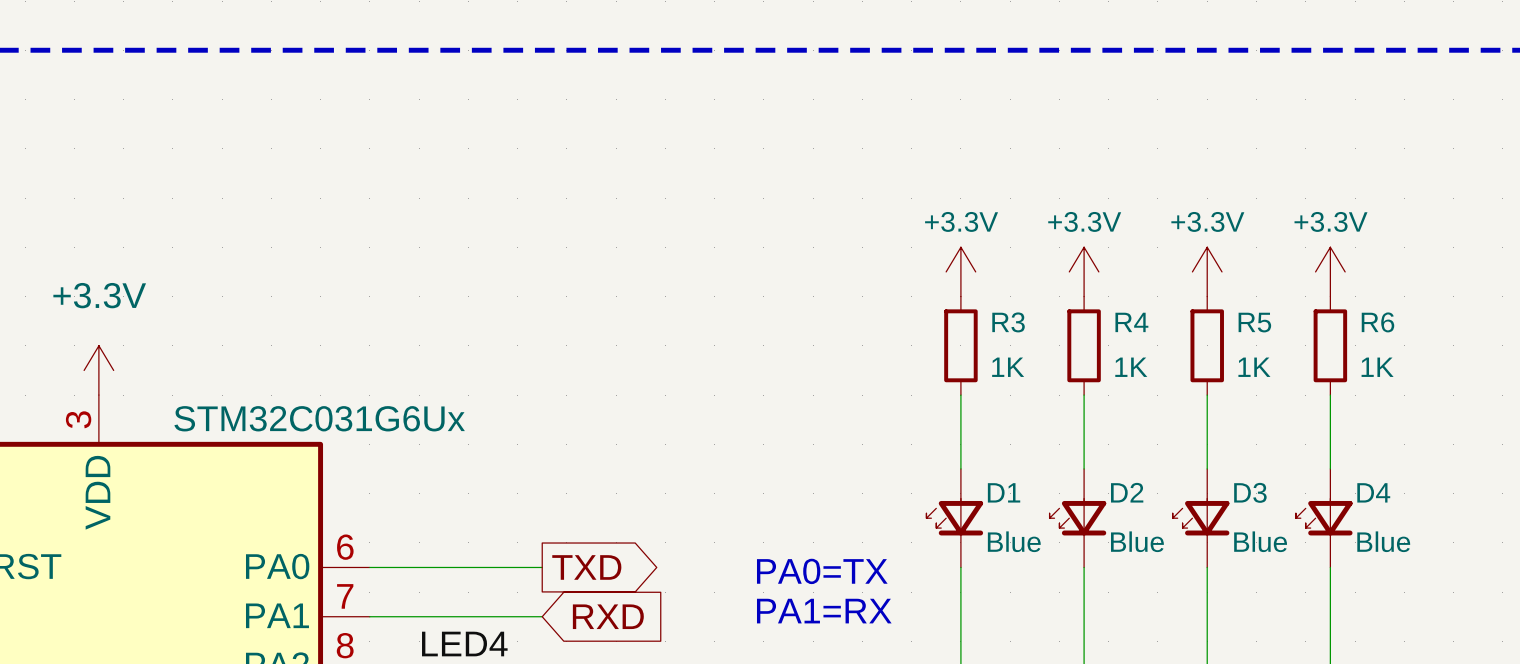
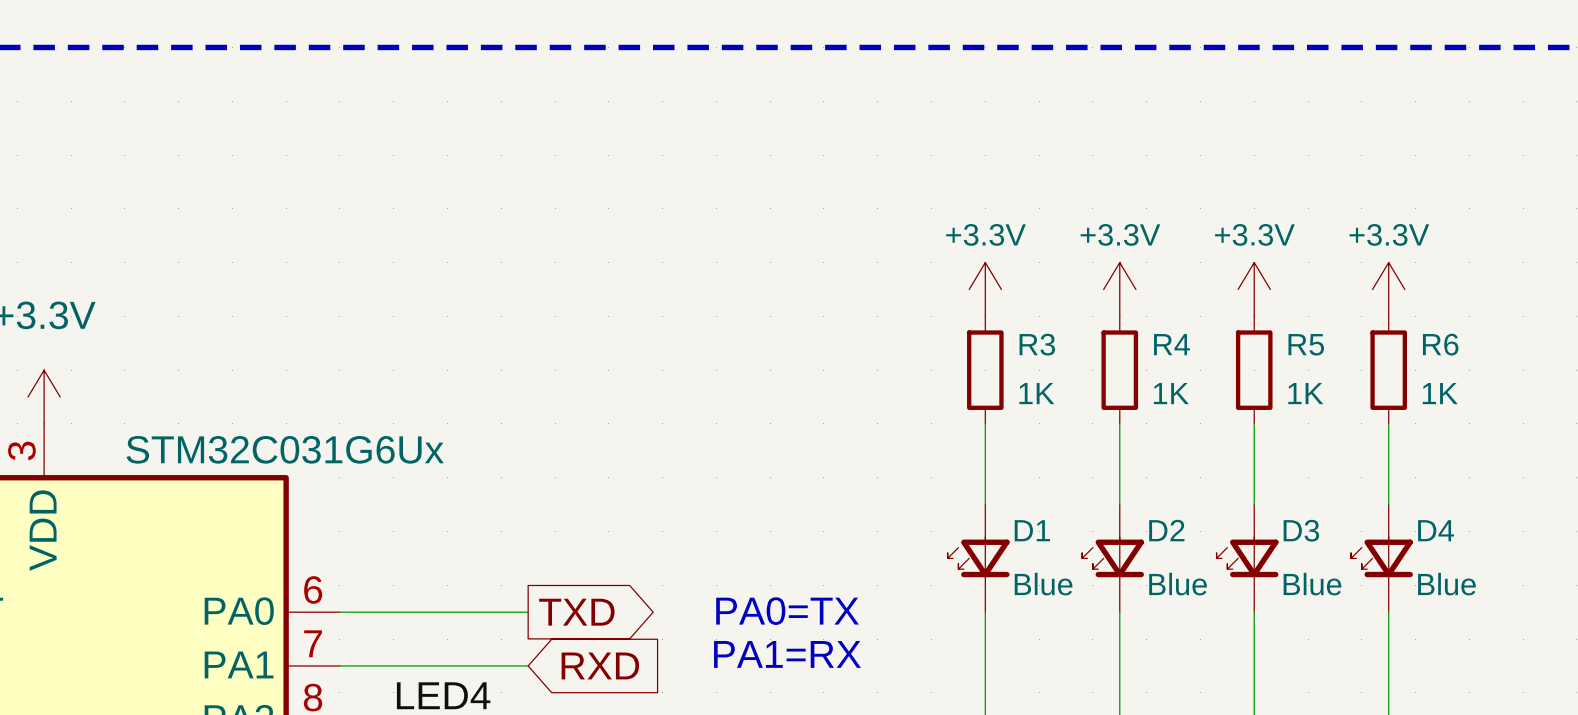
text position: PA0=TX (822, 571) -> PA0=TX (787, 611)
text position: PA1=RX (824, 611) -> PA1=RX (787, 654)

